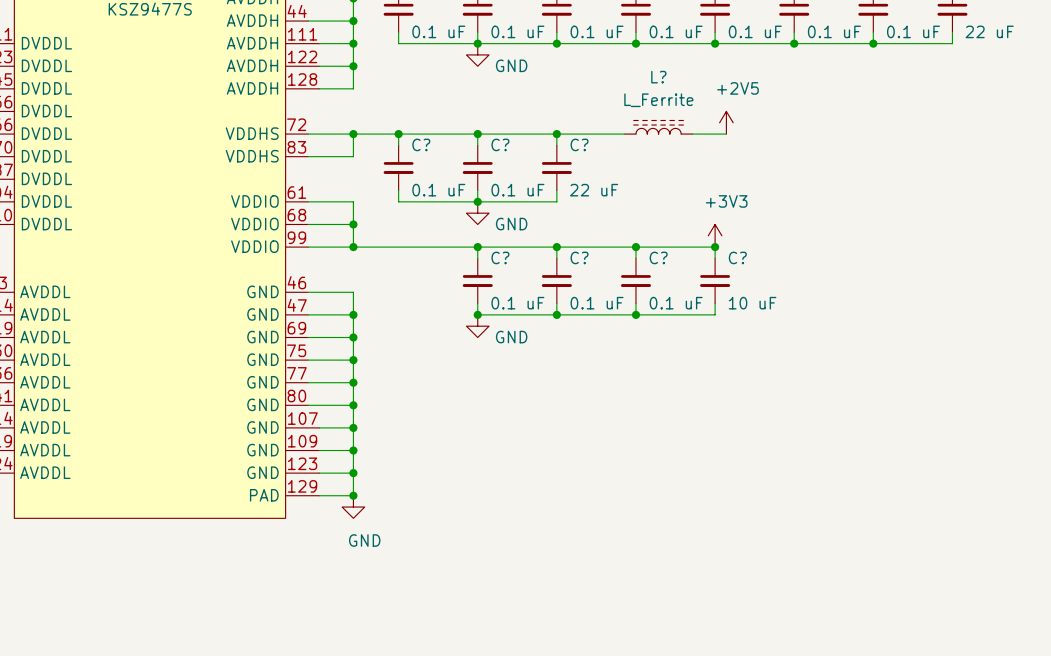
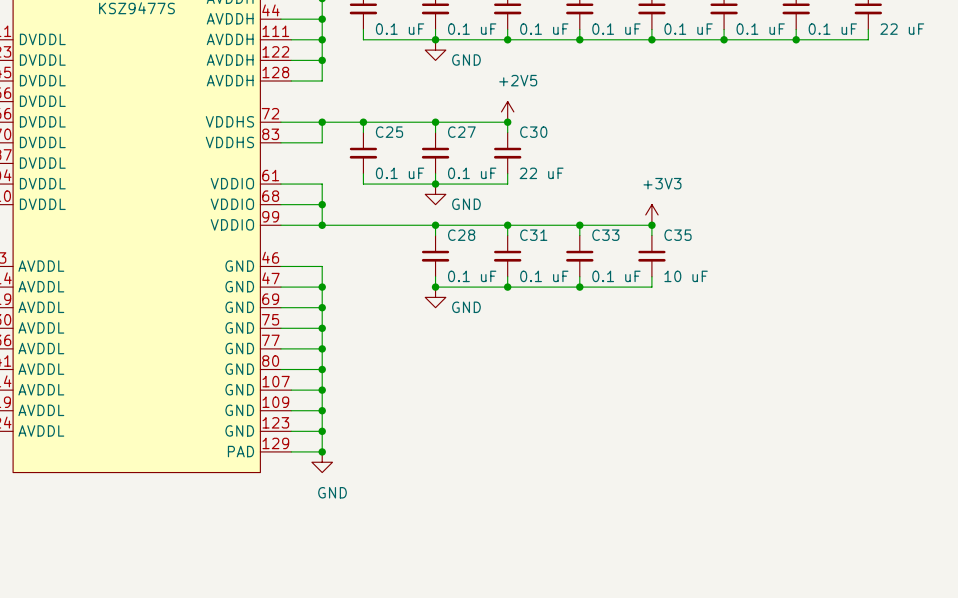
power symbol position: +2V5 (726, 122) -> +2V5 (507, 111)
L?: L_Ferrite (658, 127) -> none
wire: (556, 134) (624, 134) -> none
wire: (692, 134) (726, 134) -> none
C? name: C? (421, 144) -> C25 (389, 132)
C? name: C? (500, 144) -> C27 (461, 132)
C? name: C? (579, 144) -> C30 (533, 132)
C? name: C? (500, 257) -> C28 (461, 235)
C? name: C? (579, 257) -> C31 (533, 235)
C? name: C? (658, 257) -> C33 (605, 235)
C? name: C? (737, 257) -> C35 (678, 235)

